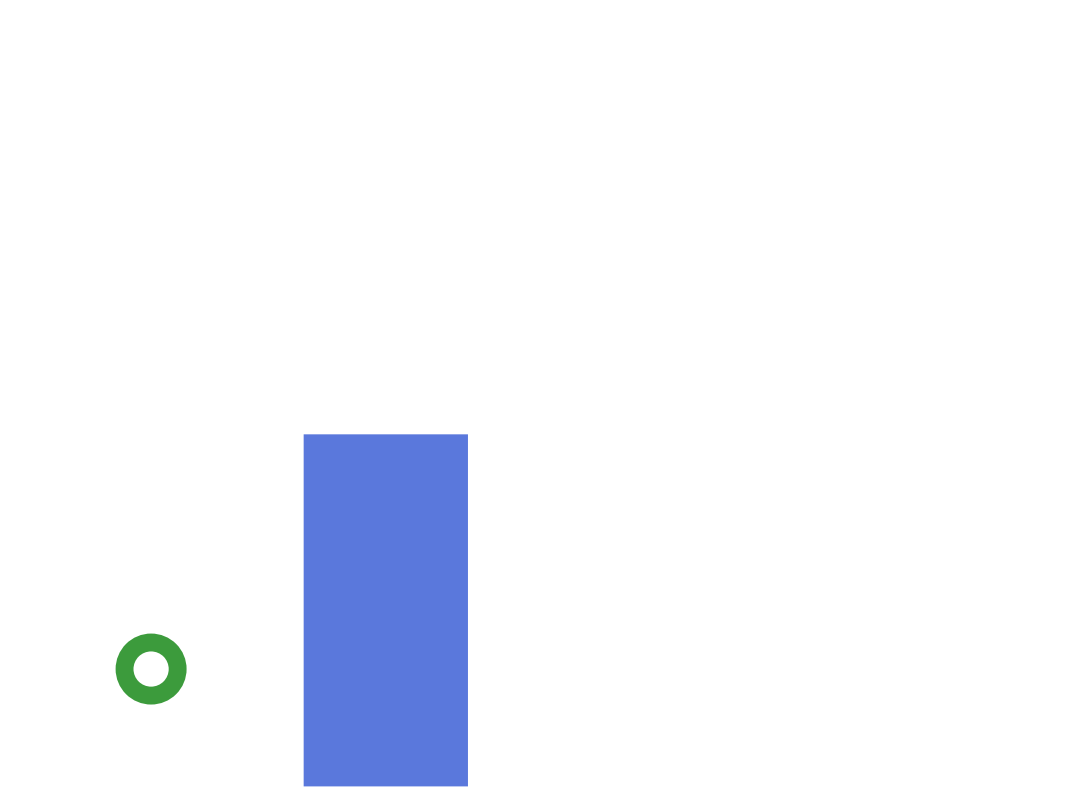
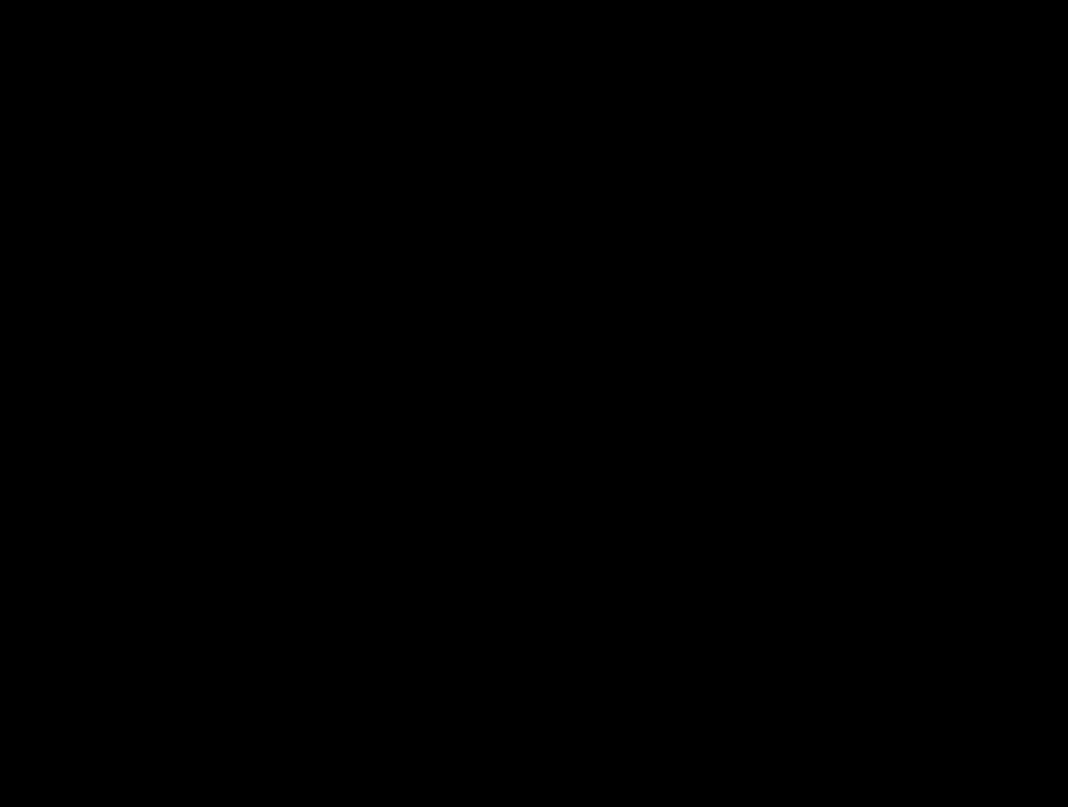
drawing: [303, 434, 468, 787] -> none
via: (151, 669) -> none

